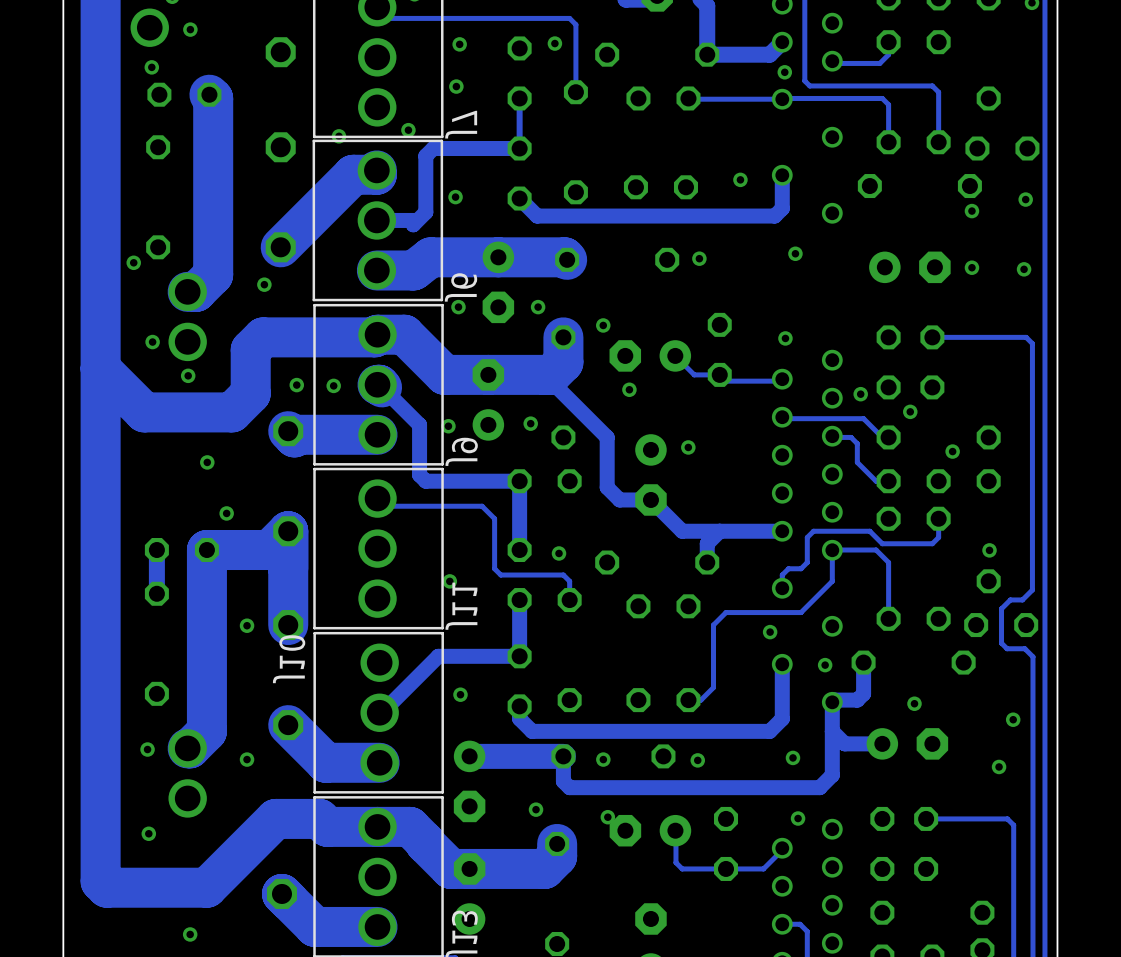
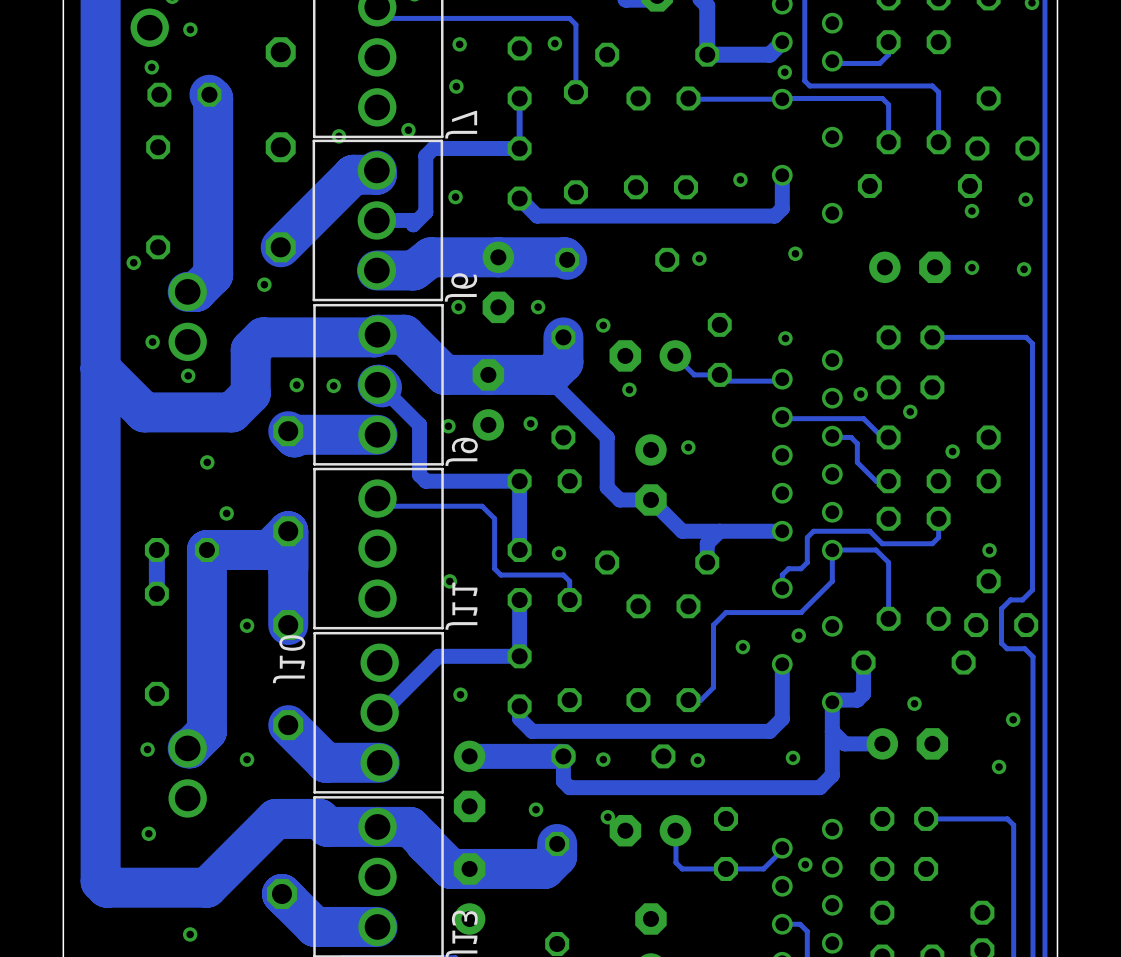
via: (770, 632) -> none
via: none -> (798, 635)
via: none -> (742, 647)
via: (825, 665) -> none
via position: (798, 818) -> (805, 864)

